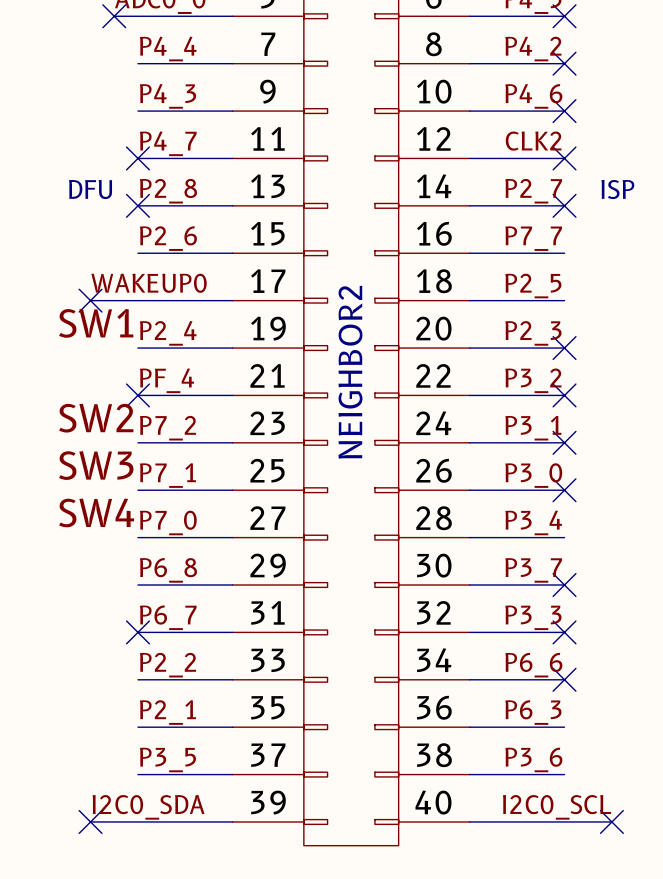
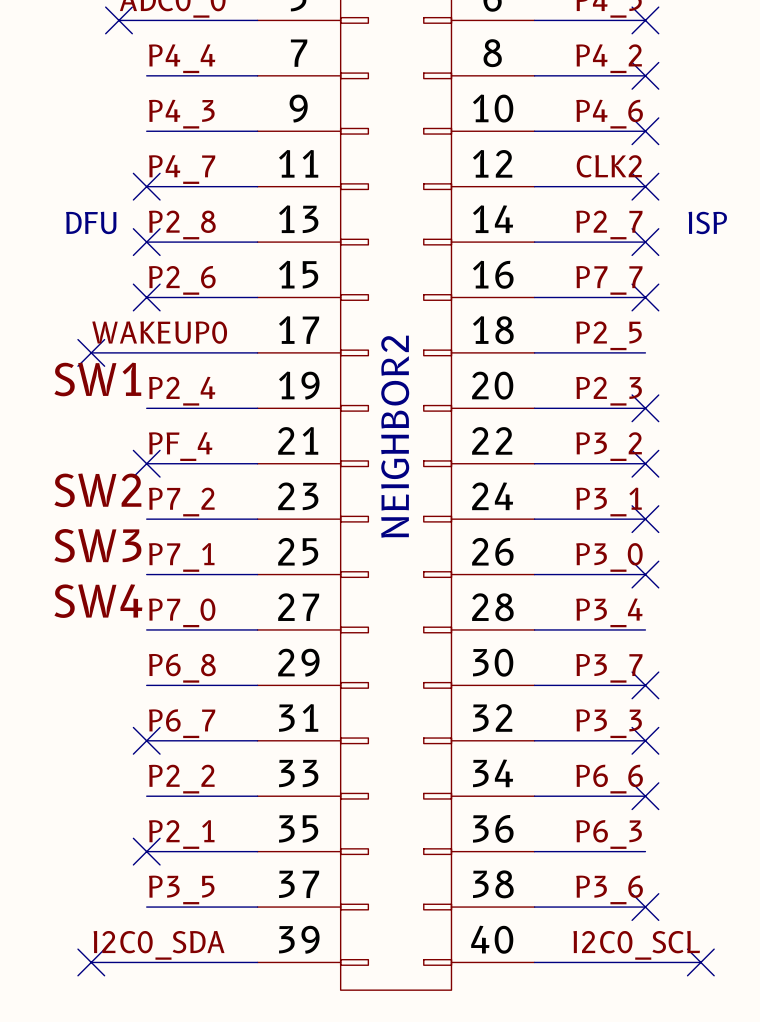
no-connect mark: none -> (146, 297)
no-connect mark: none -> (645, 297)
no-connect mark: none -> (146, 851)
no-connect mark: none -> (645, 907)

